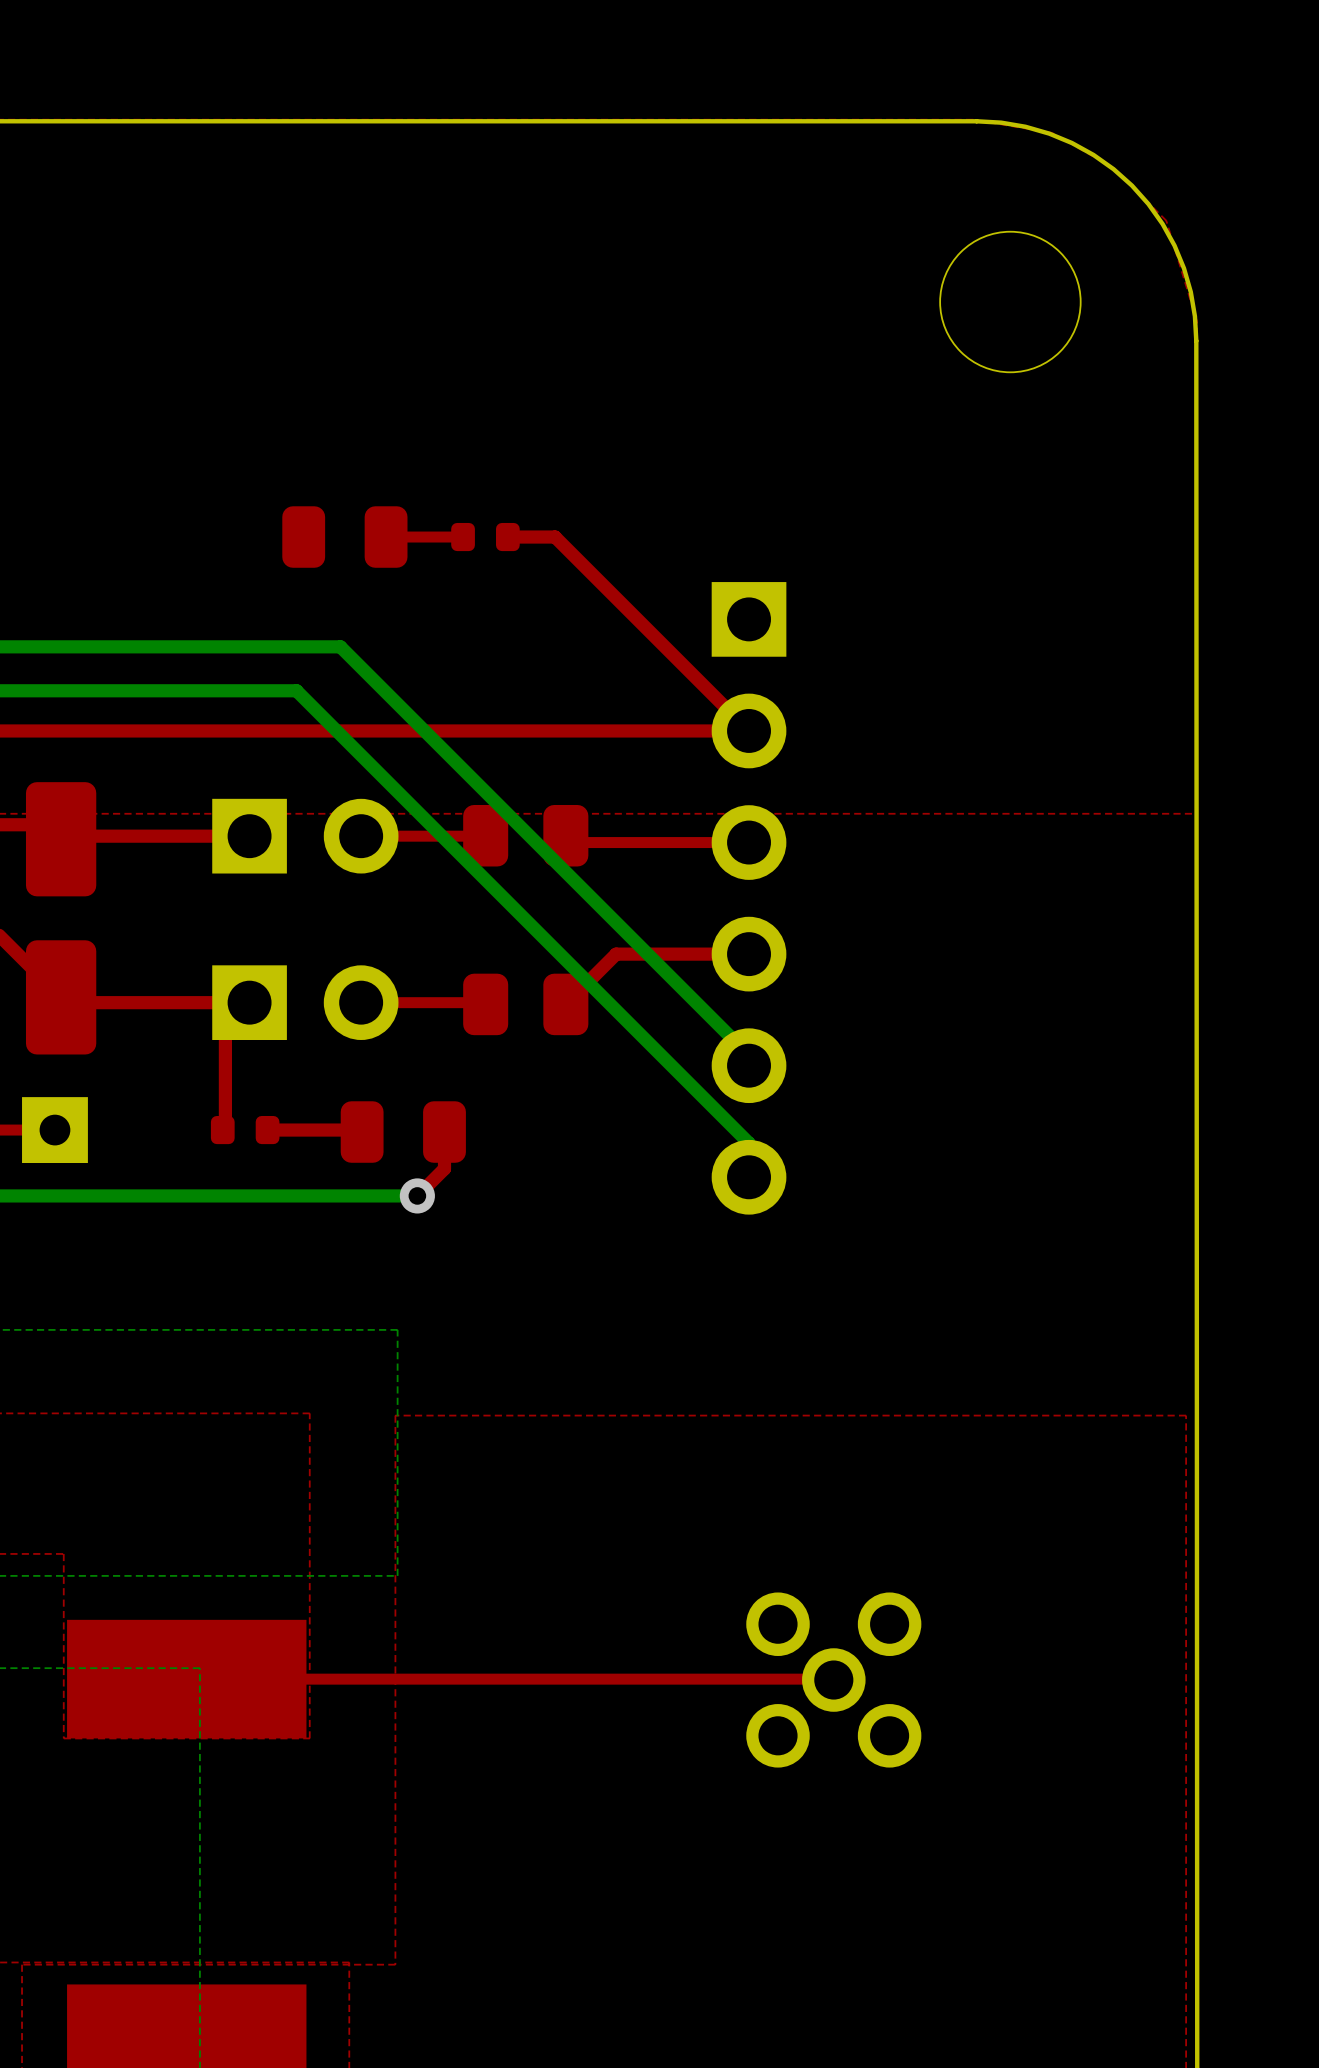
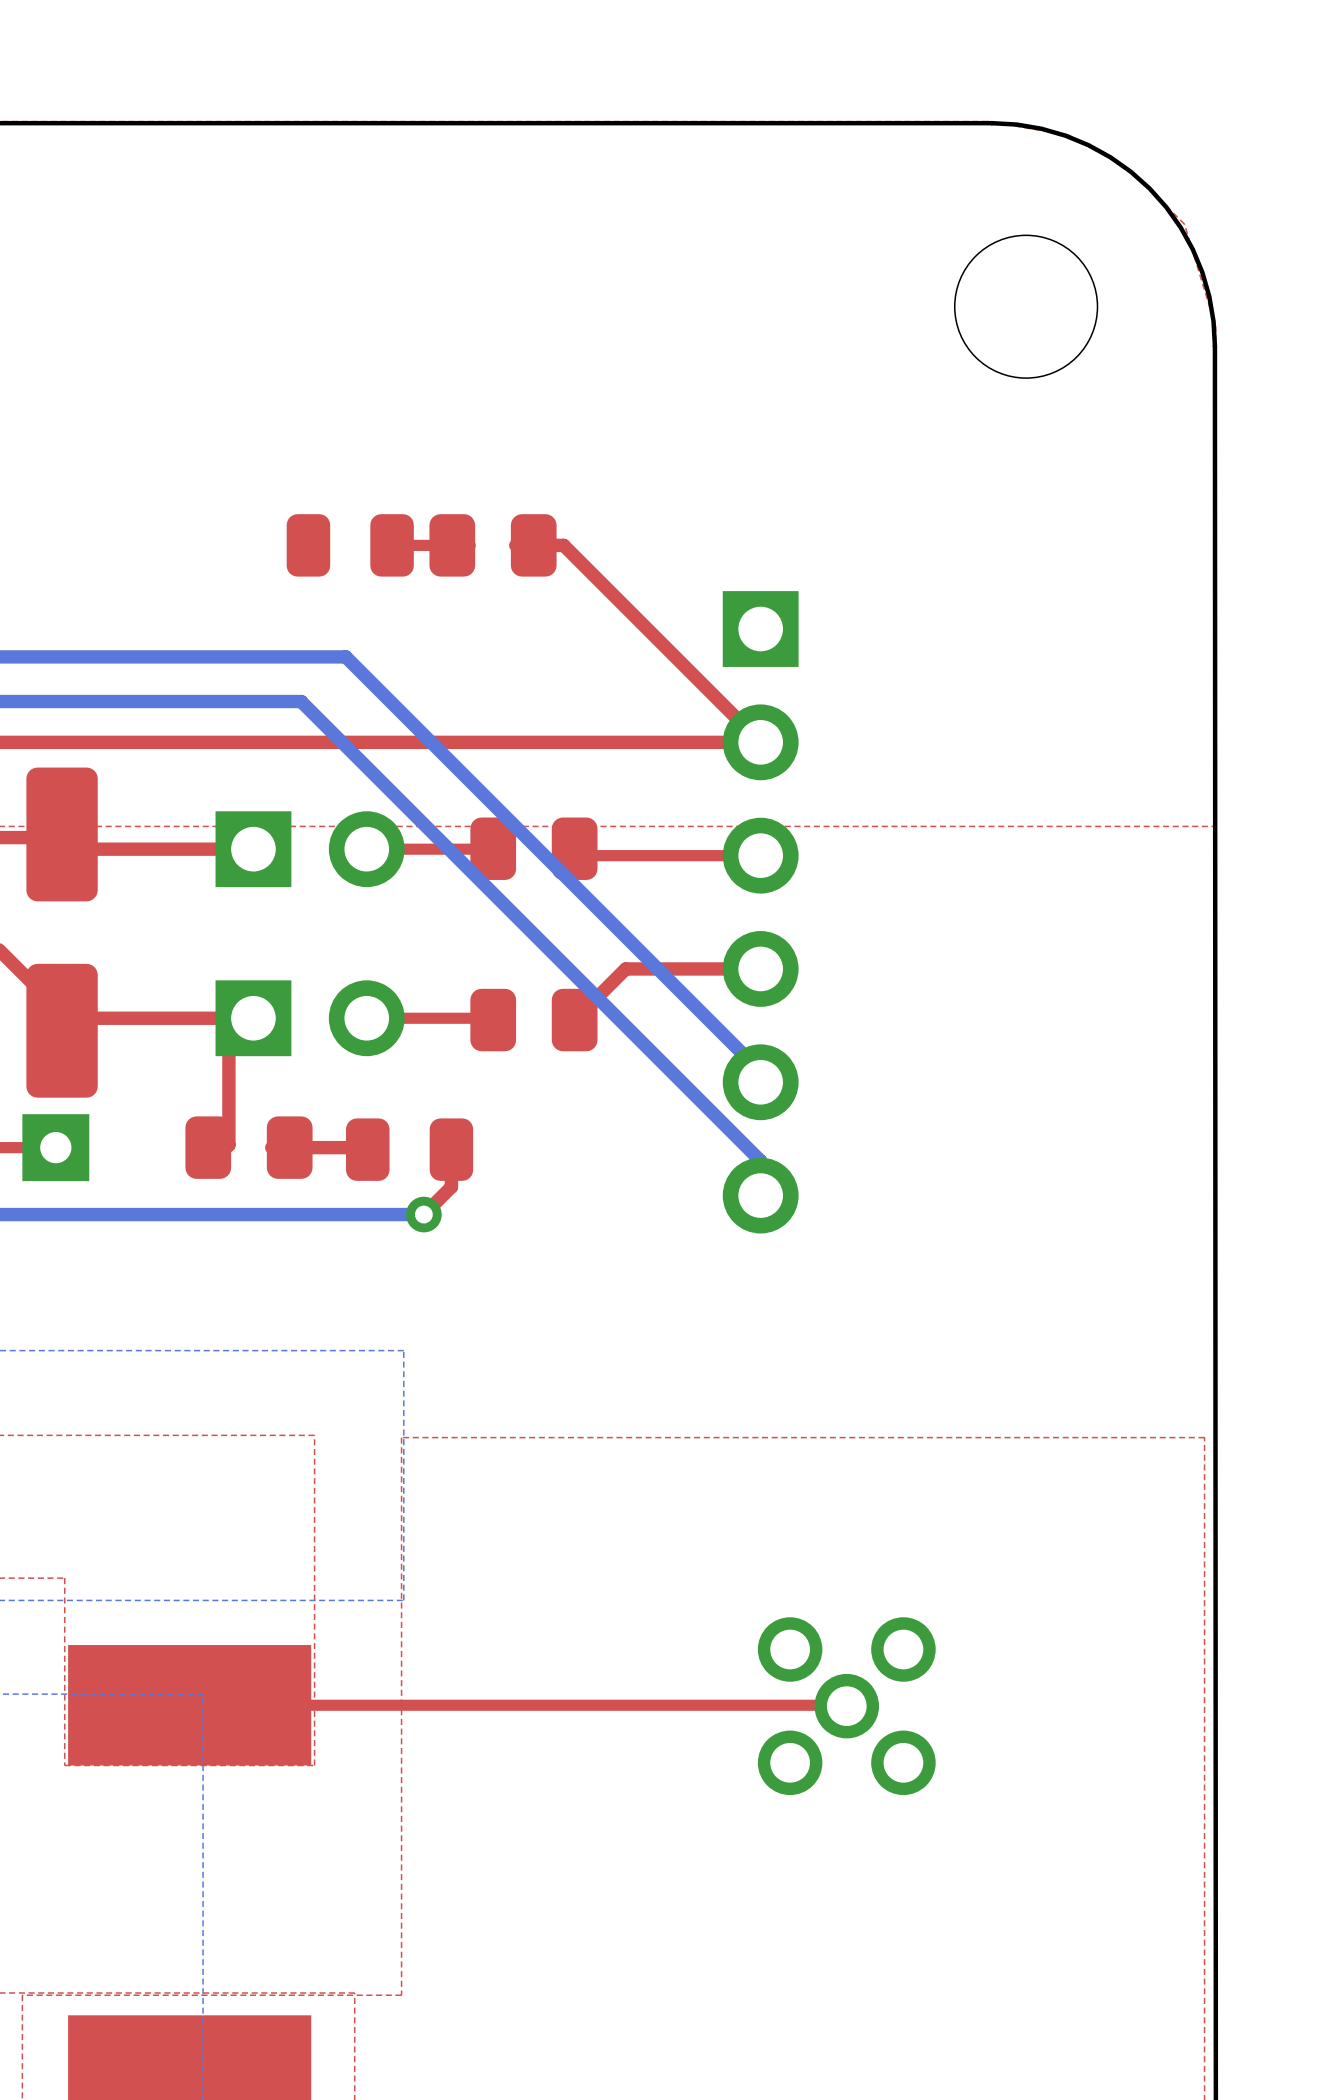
part footprint: [451, 522, 520, 552] -> [429, 514, 557, 577]
part footprint: [25, 782, 97, 1055] -> [26, 767, 98, 1098]
part footprint: [210, 1115, 280, 1145] -> [185, 1116, 313, 1179]

